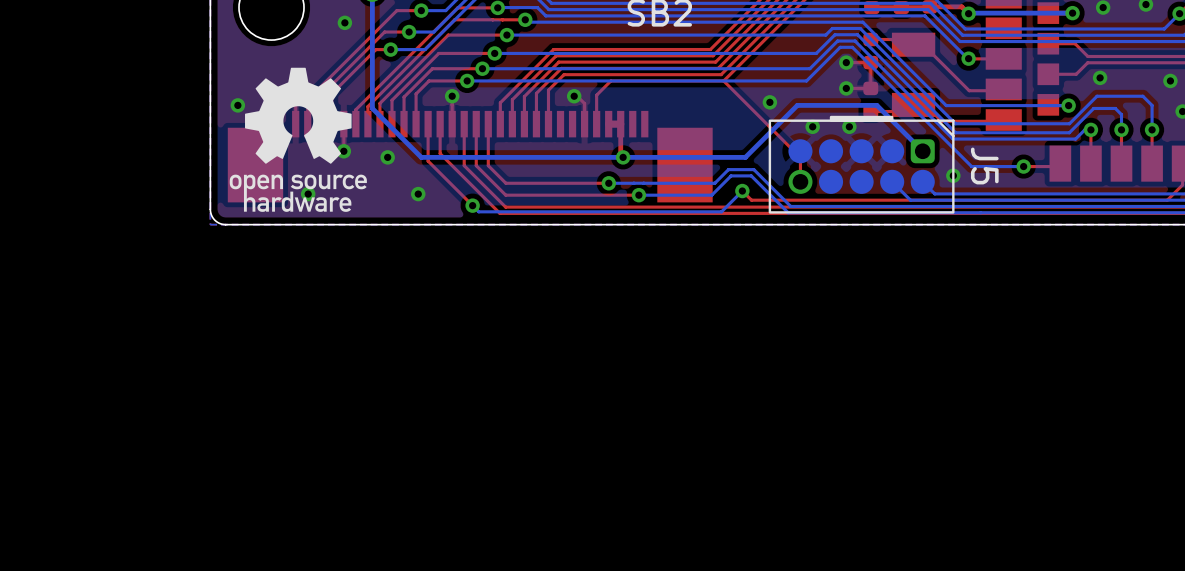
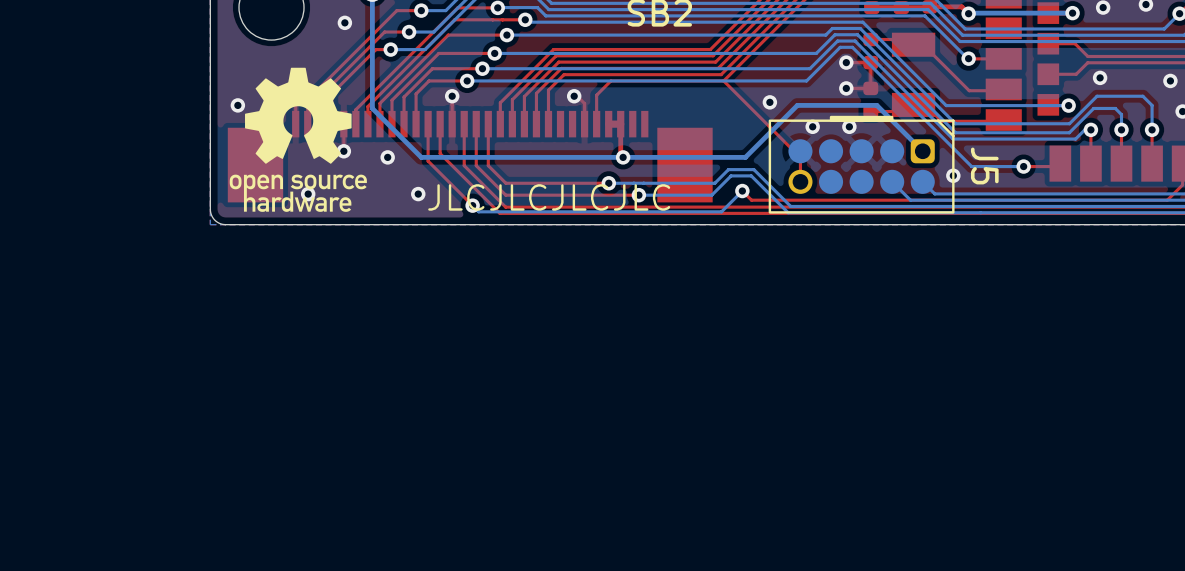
text: none -> JLCJLCJLCJLC (549, 197)

